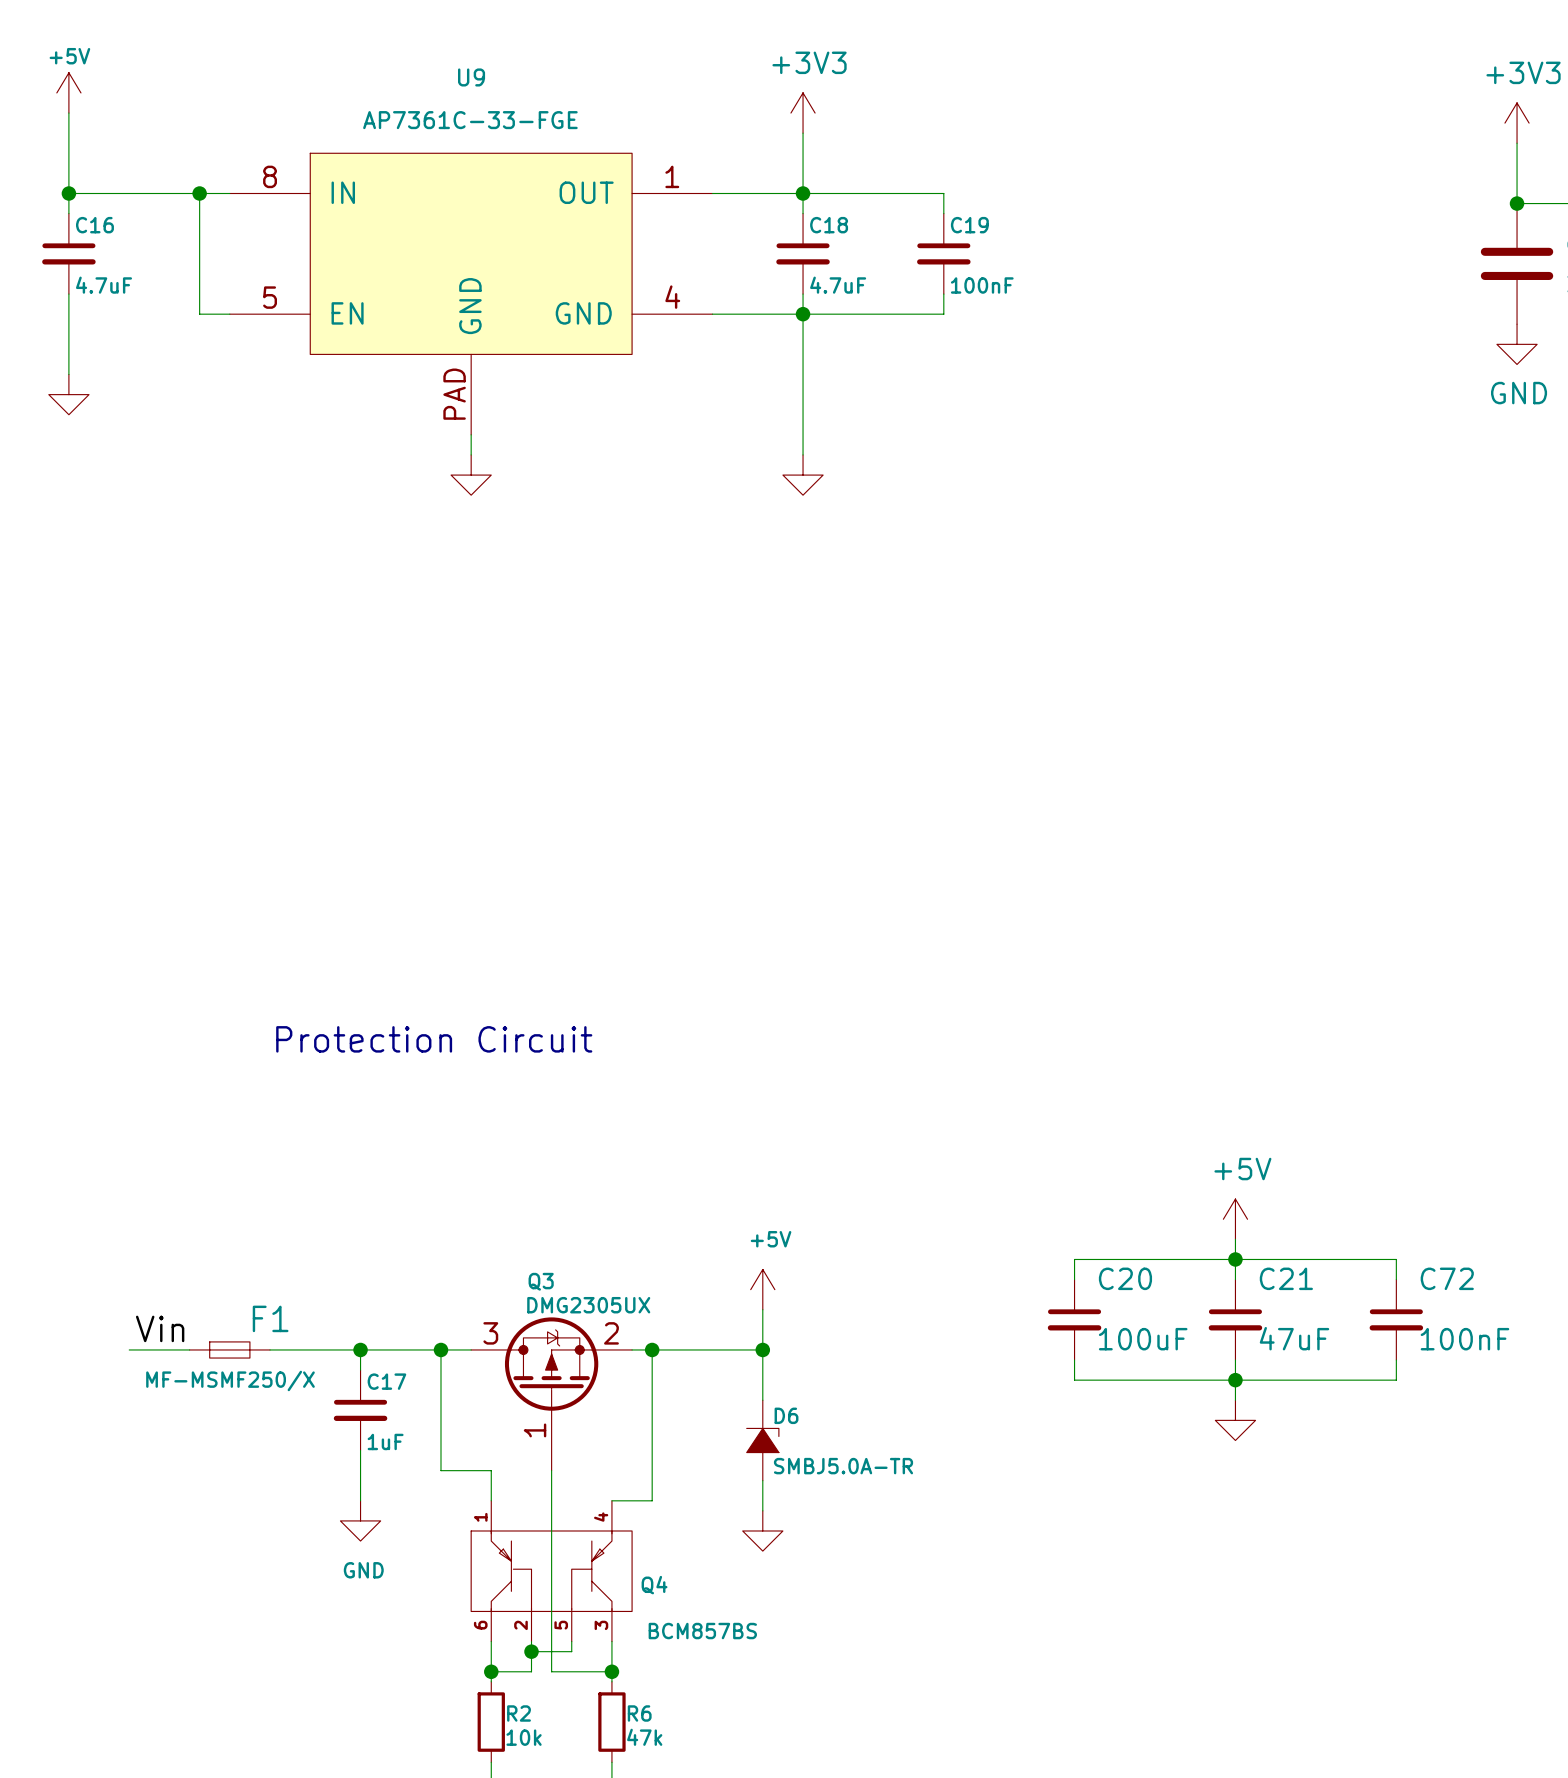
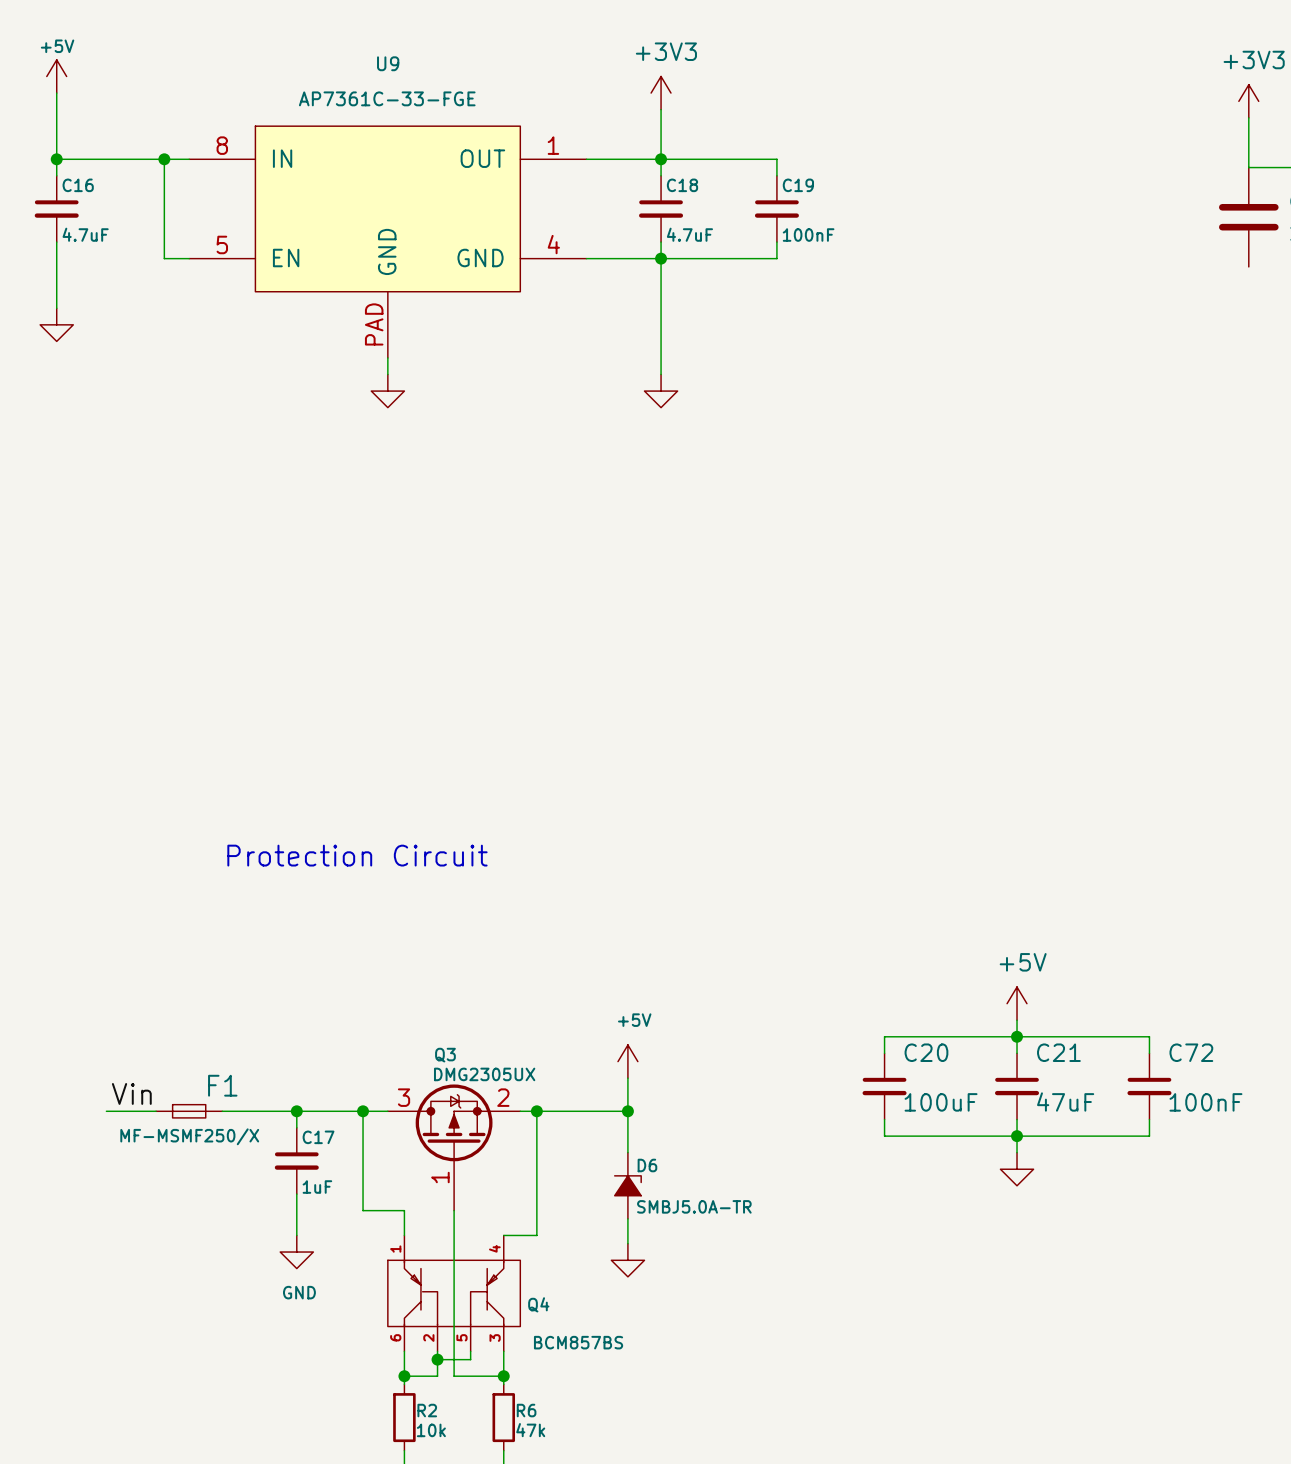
junction: (1517, 203) -> none
power symbol: GND (1517, 344) -> none

